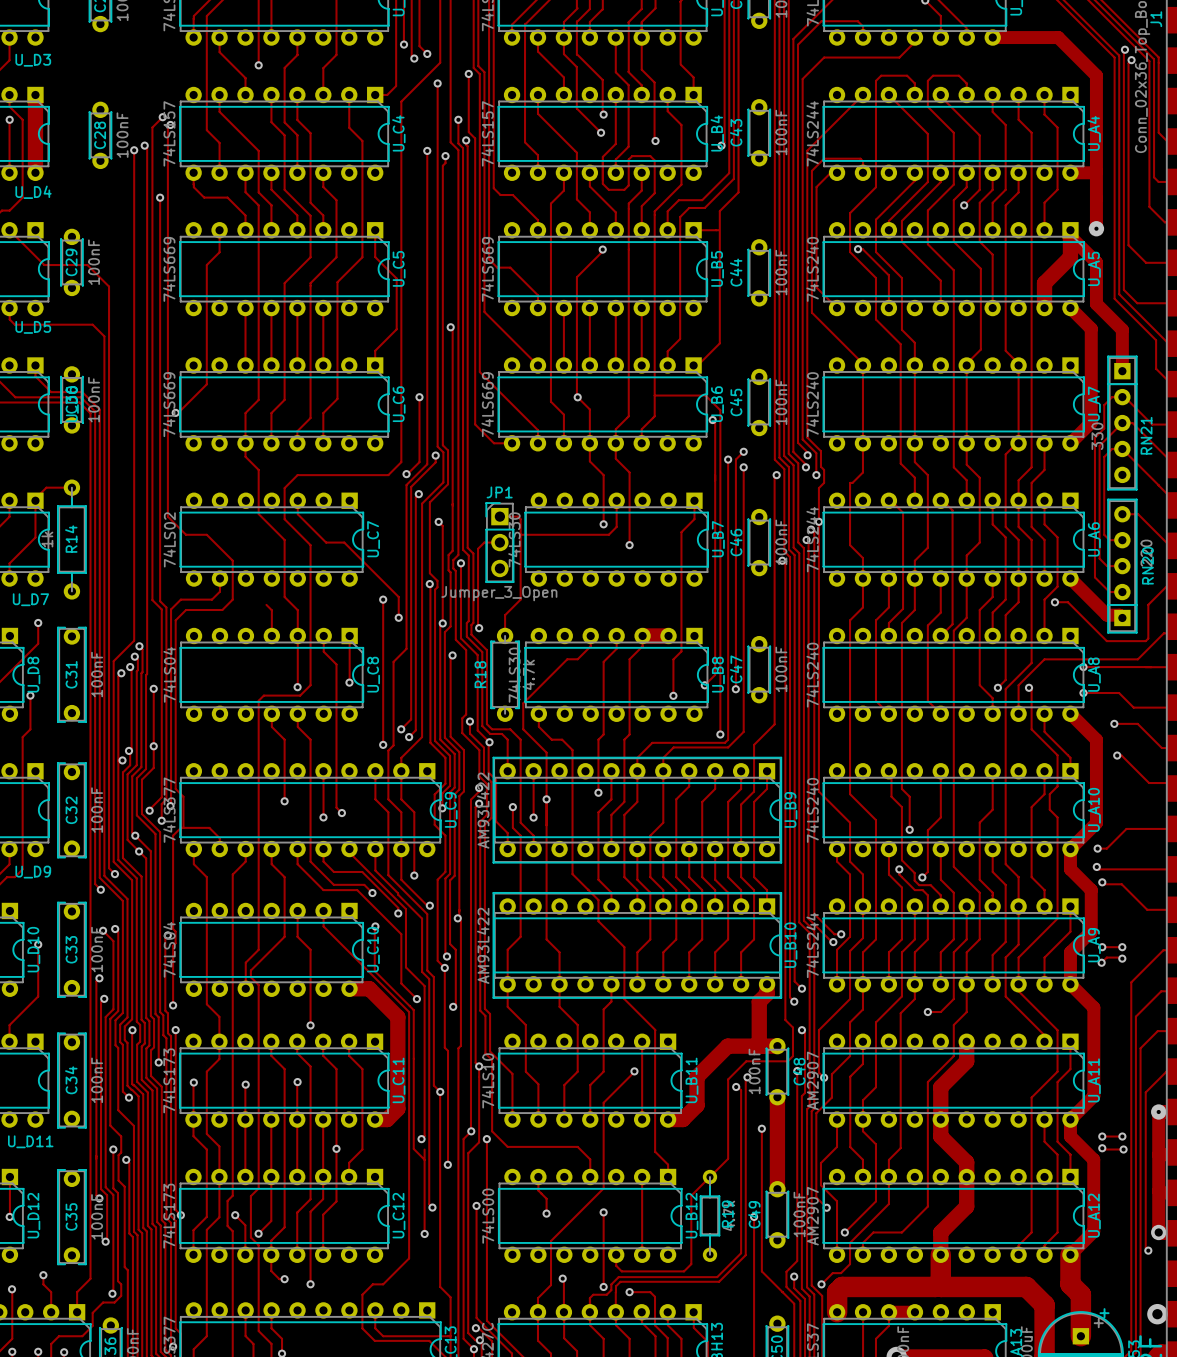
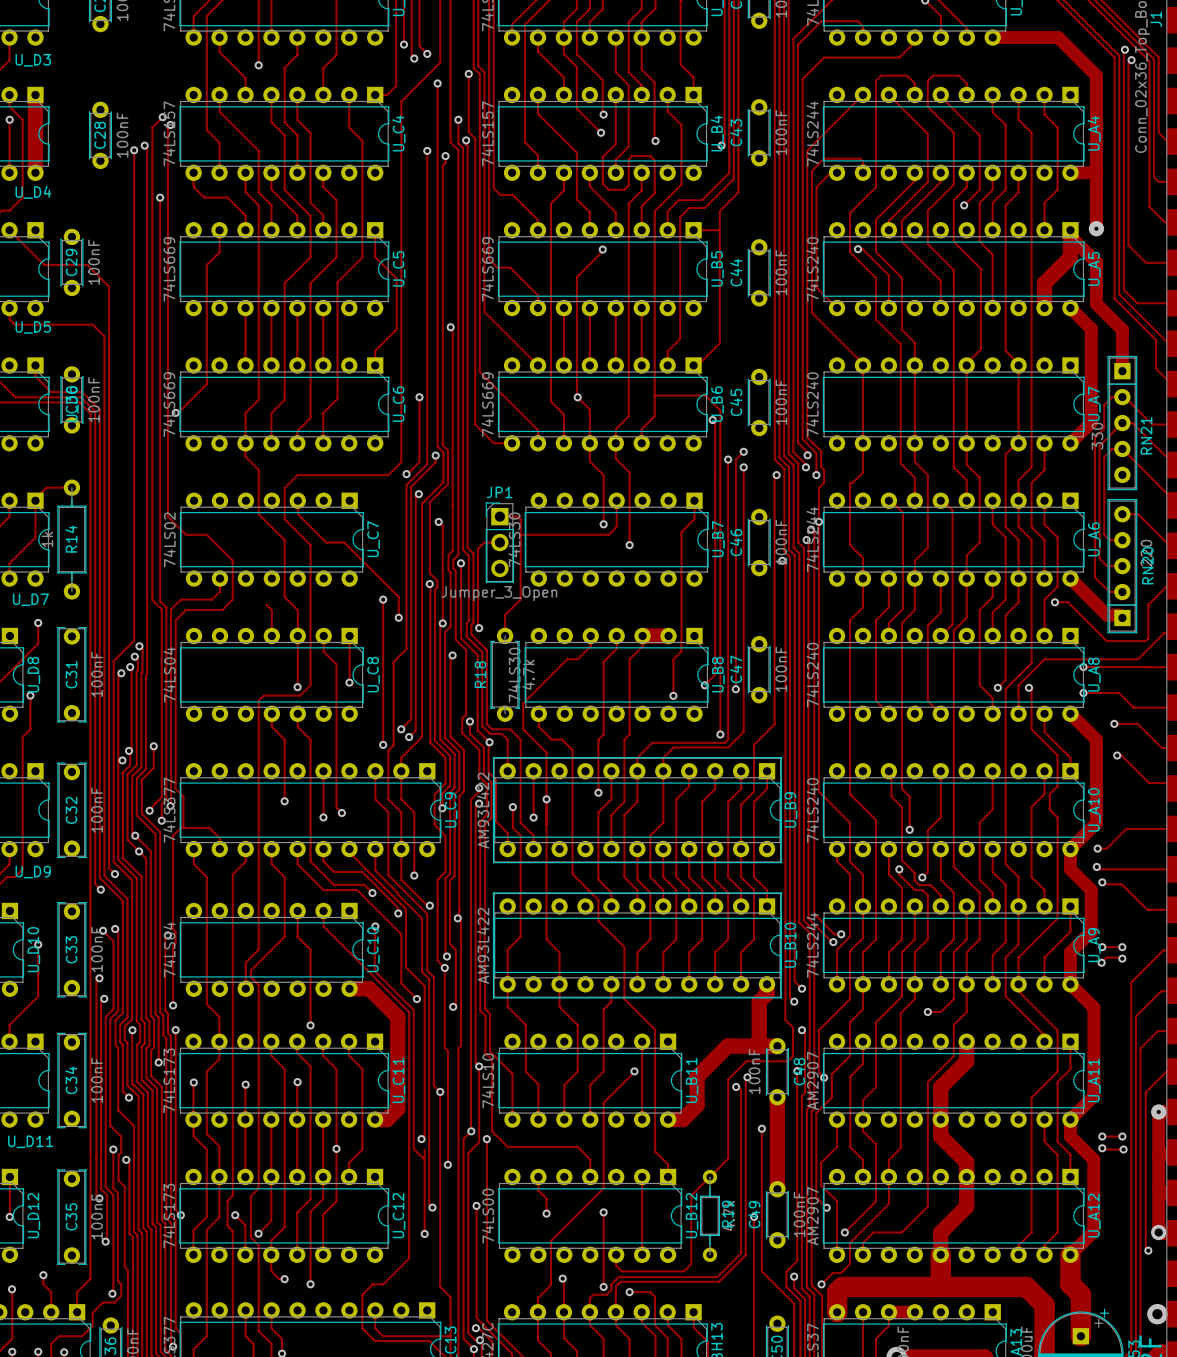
track: (153, 688) (153, 746) -> none
via: (153, 688) -> none

